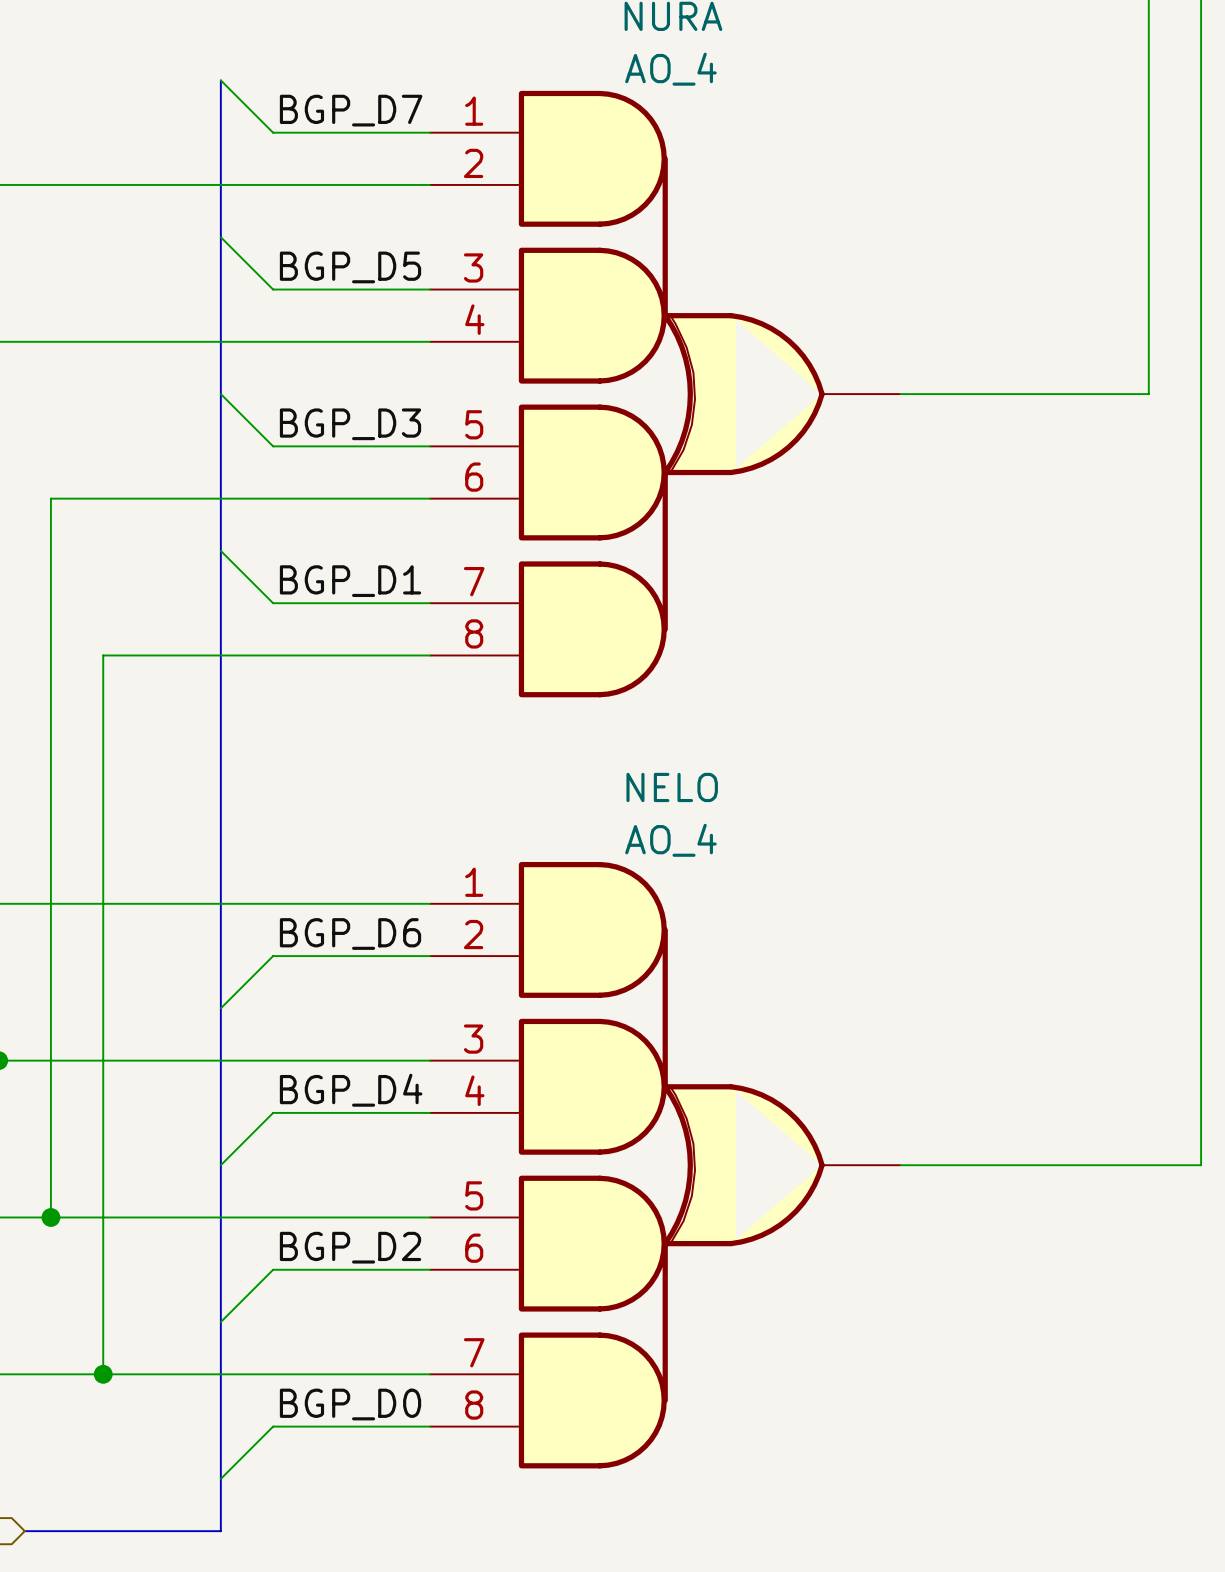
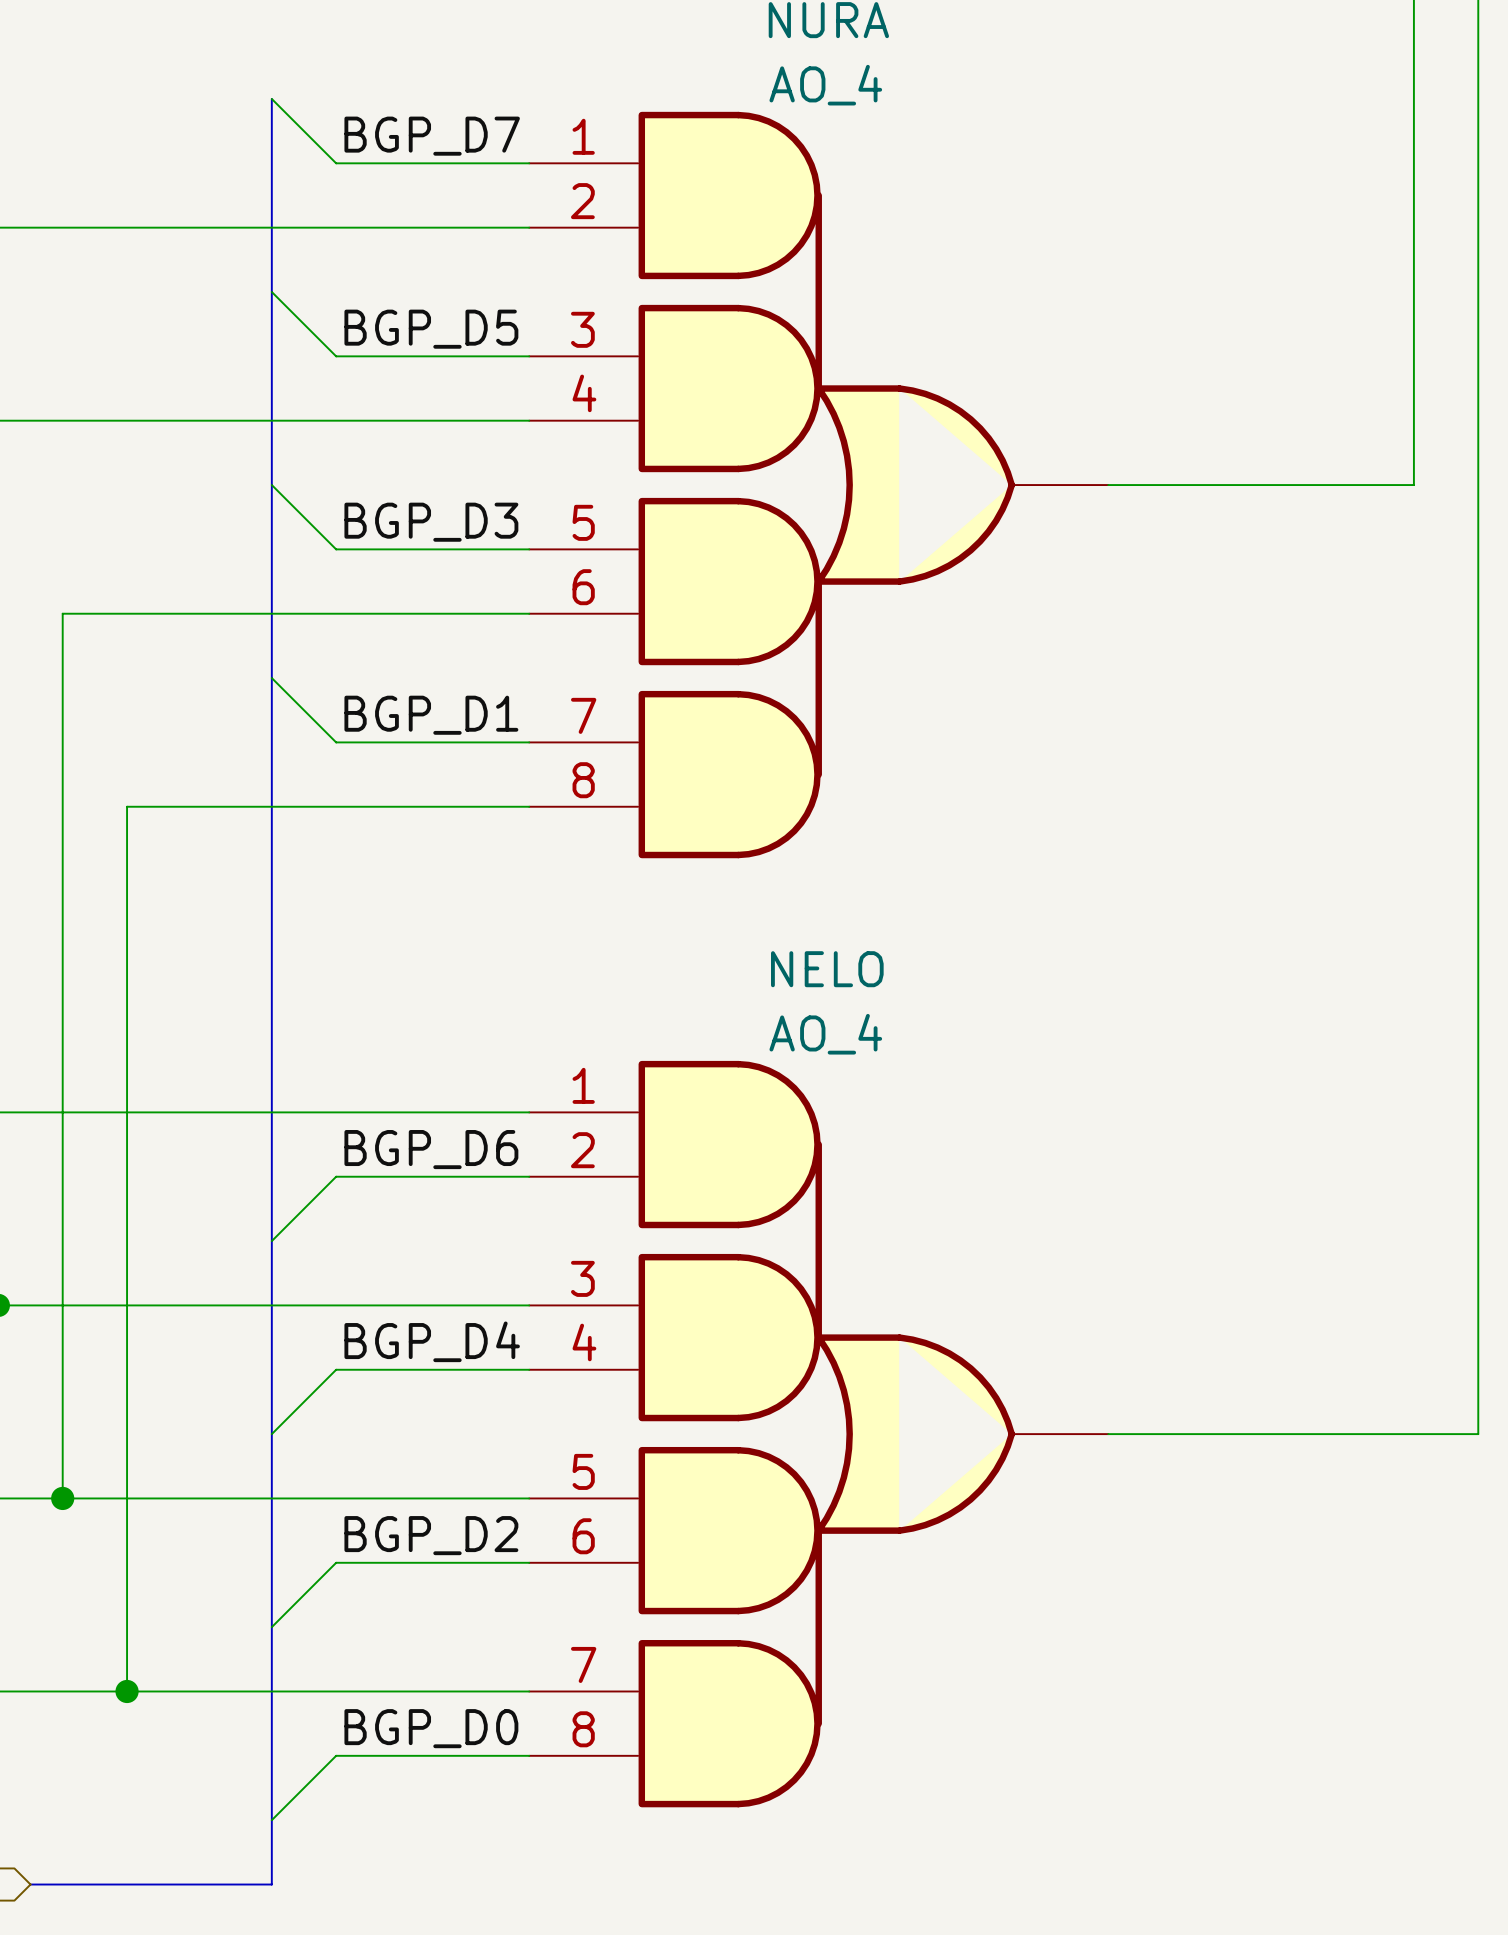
NURA symbol: [429, 90, 901, 698] -> [529, 111, 1109, 859]
NELO symbol: [429, 861, 901, 1469] -> [529, 1060, 1109, 1808]

